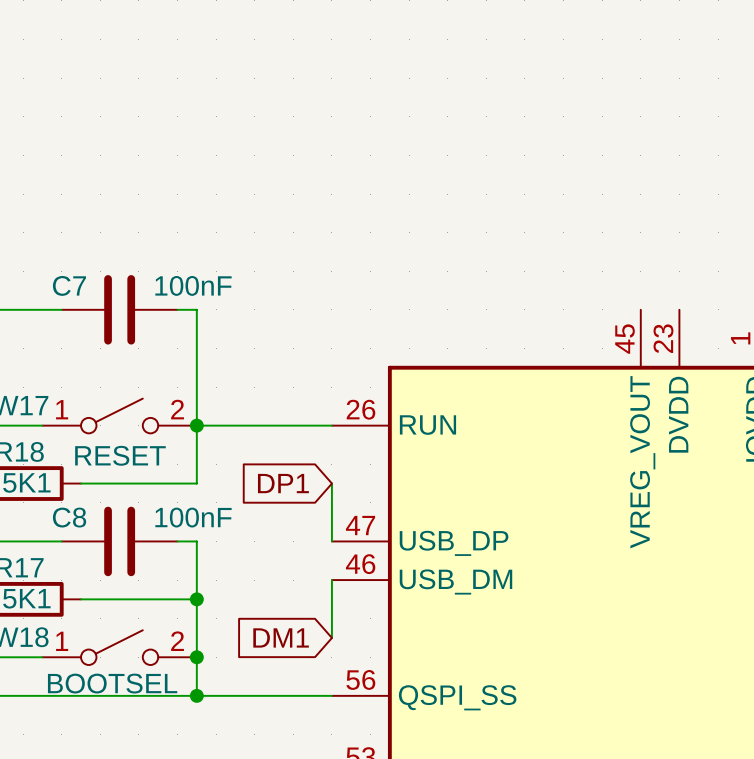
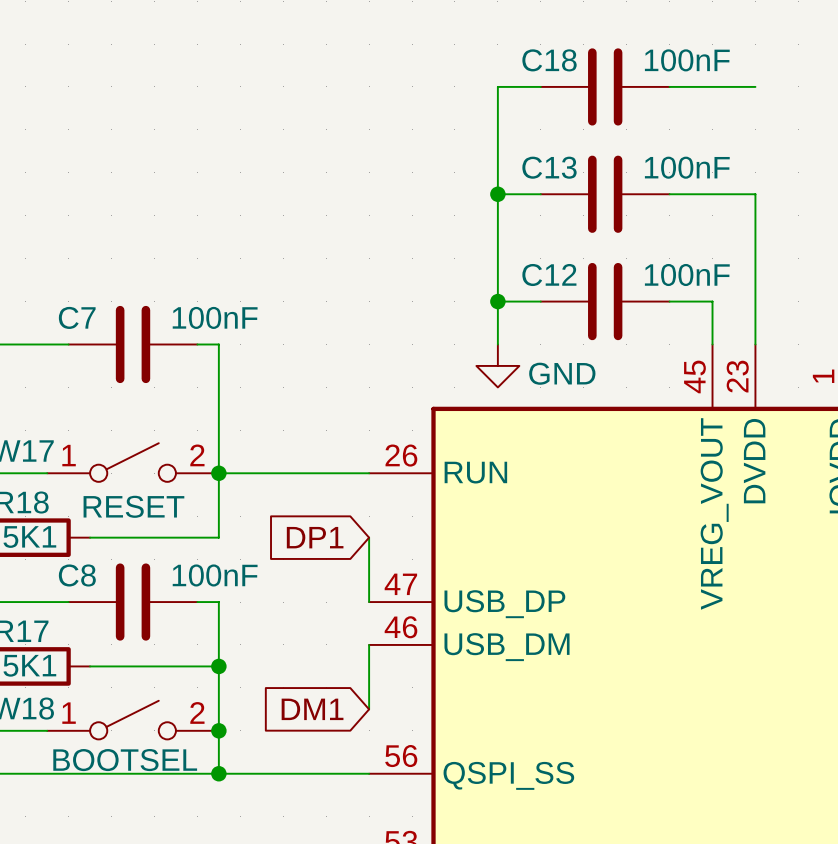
wire: none -> (540, 86) (497, 86) (497, 344)
C18: none -> 100nF (605, 86)
wire: none -> (669, 86) (755, 86)
wire: none -> (497, 194) (540, 194)
junction: none -> (497, 194)
C13: none -> 100nF (605, 194)
wire: none -> (669, 194) (755, 194) (755, 344)
wire: none -> (497, 301) (540, 301)
junction: none -> (497, 301)
C12: none -> 100nF (605, 301)
wire: none -> (669, 301) (712, 301) (712, 344)
power symbol: none -> GND (497, 365)

